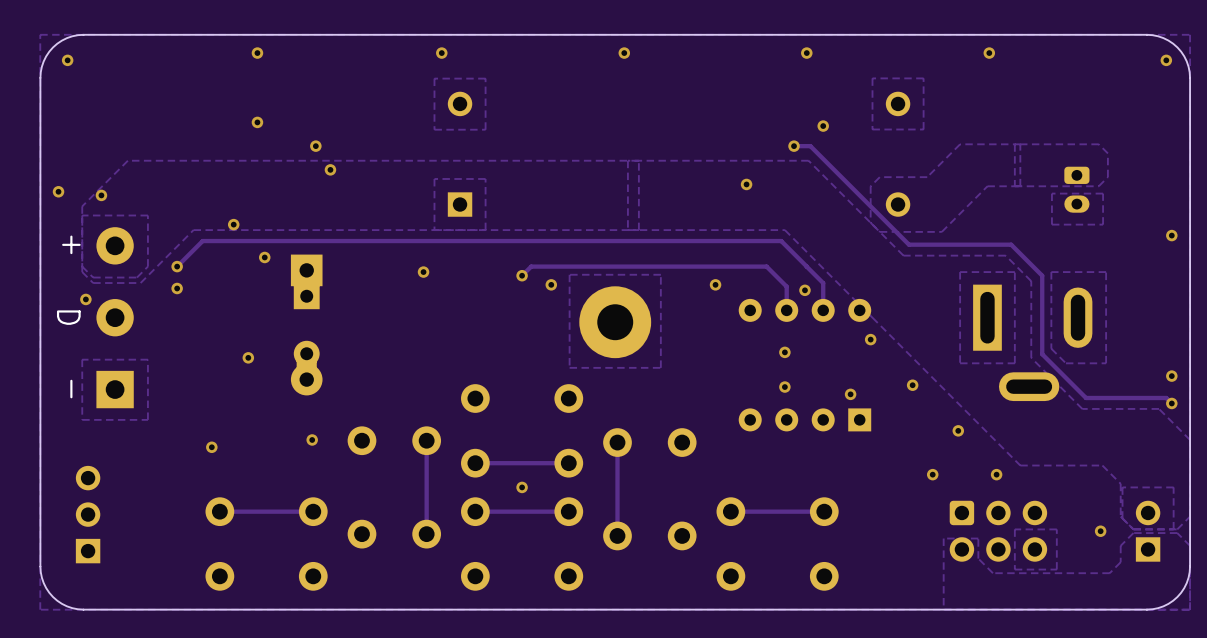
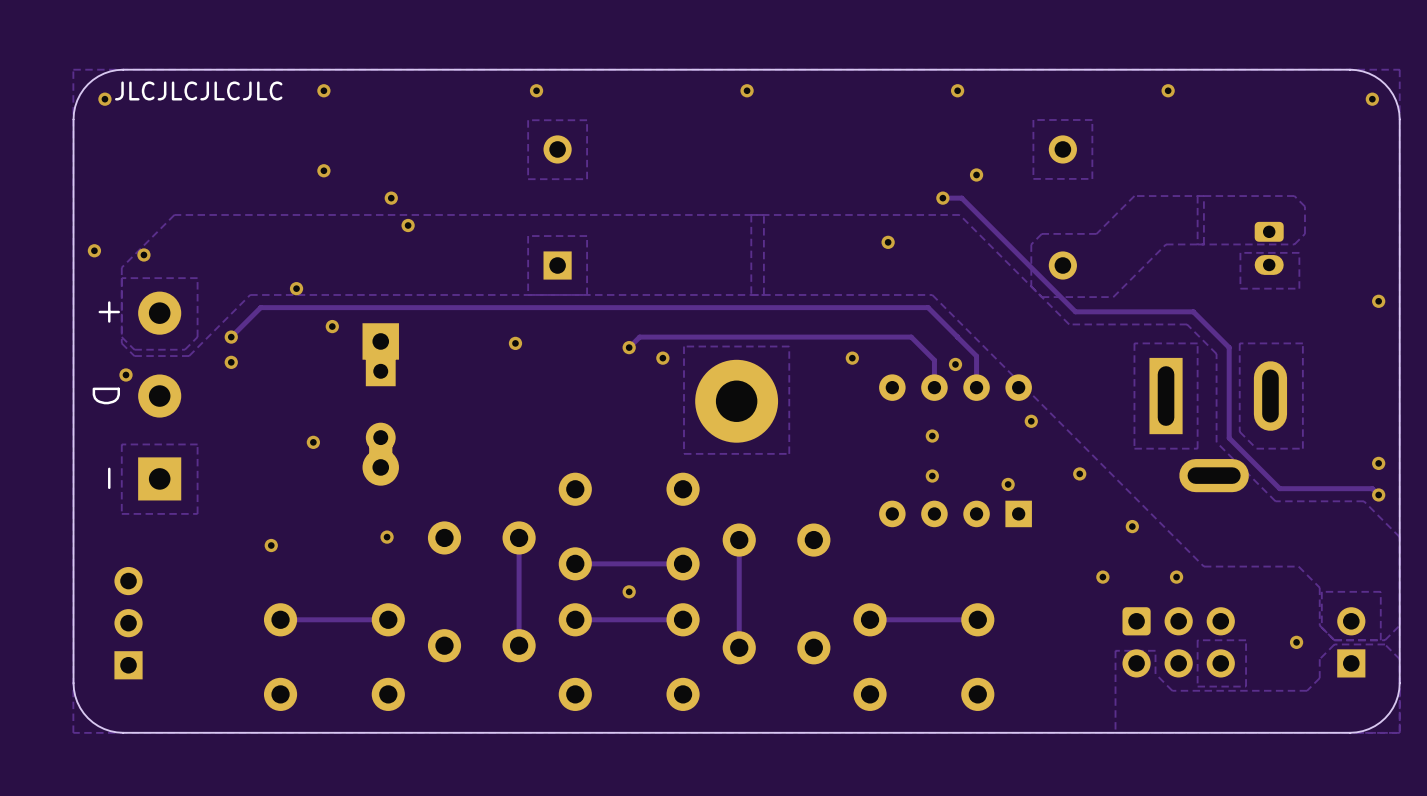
text: none -> JLCJLCJLCJLC (198, 90)

